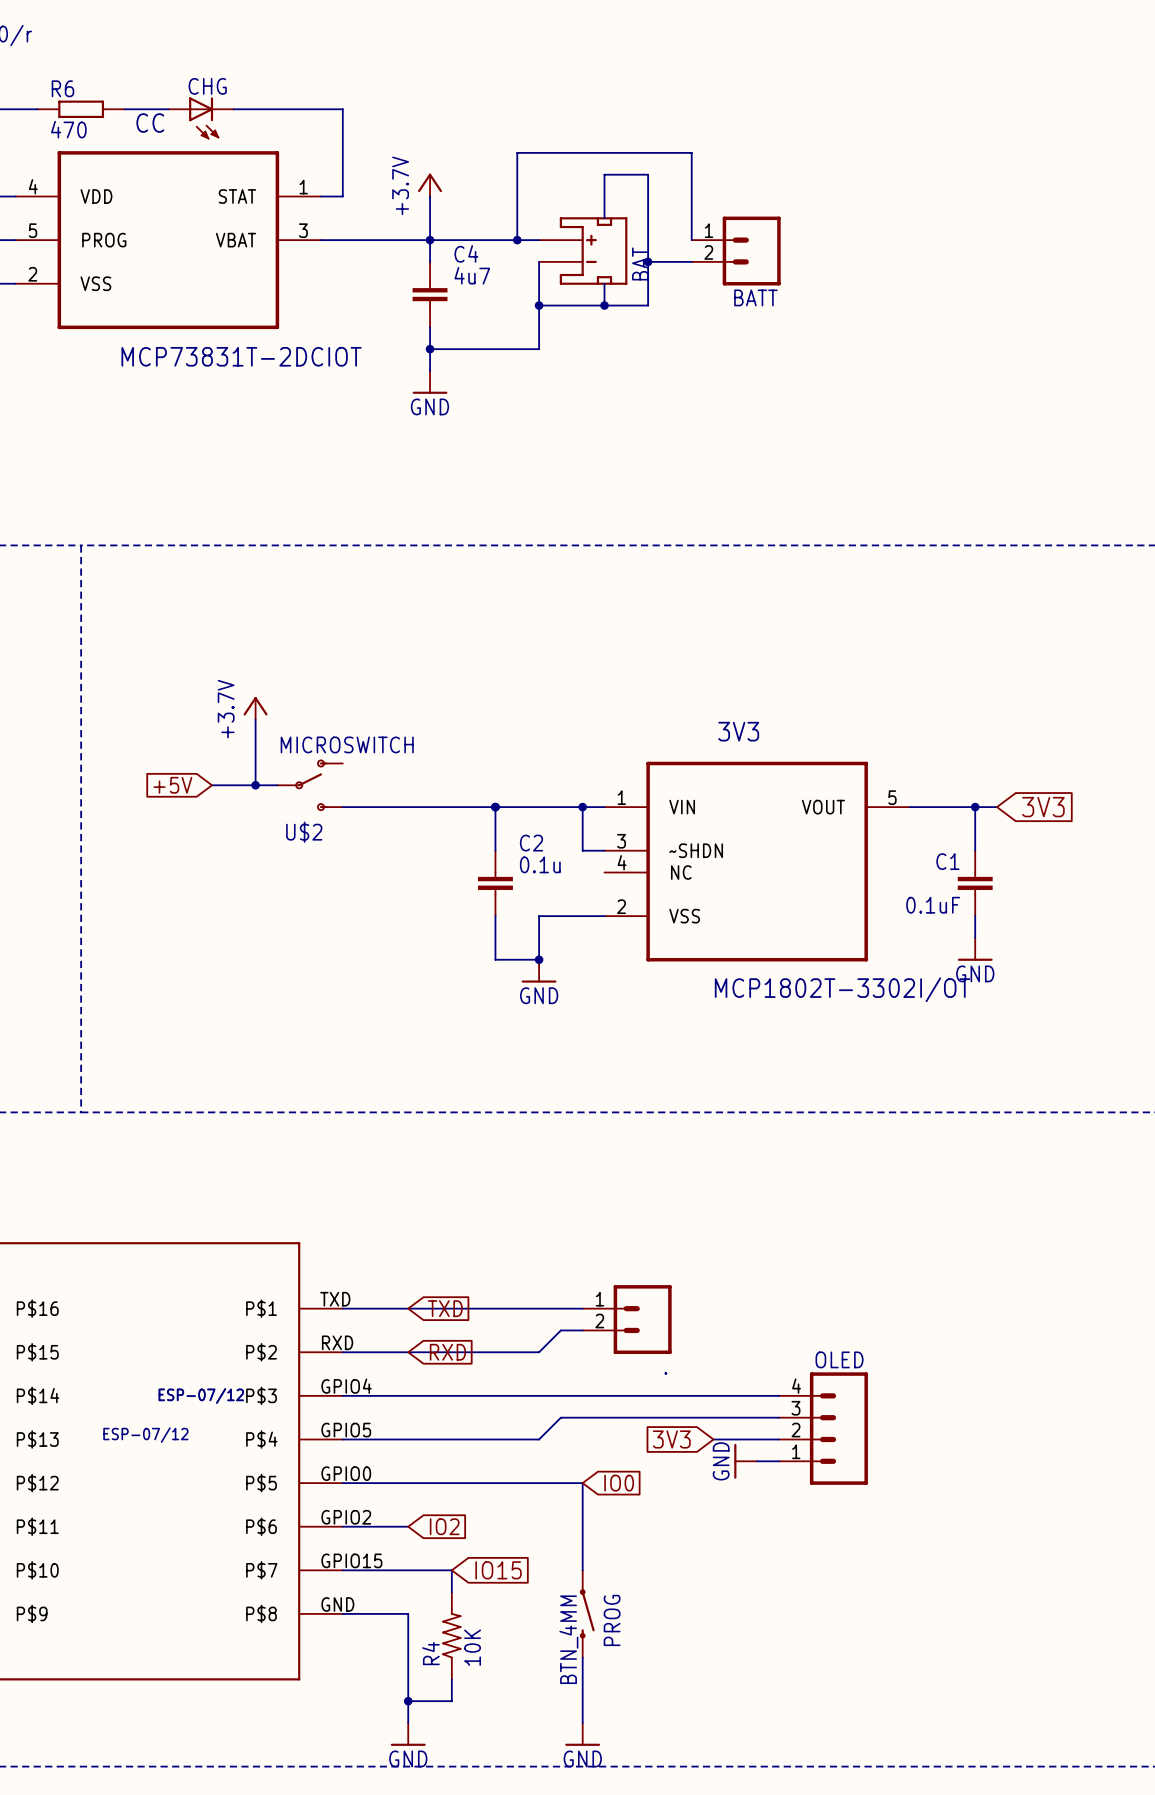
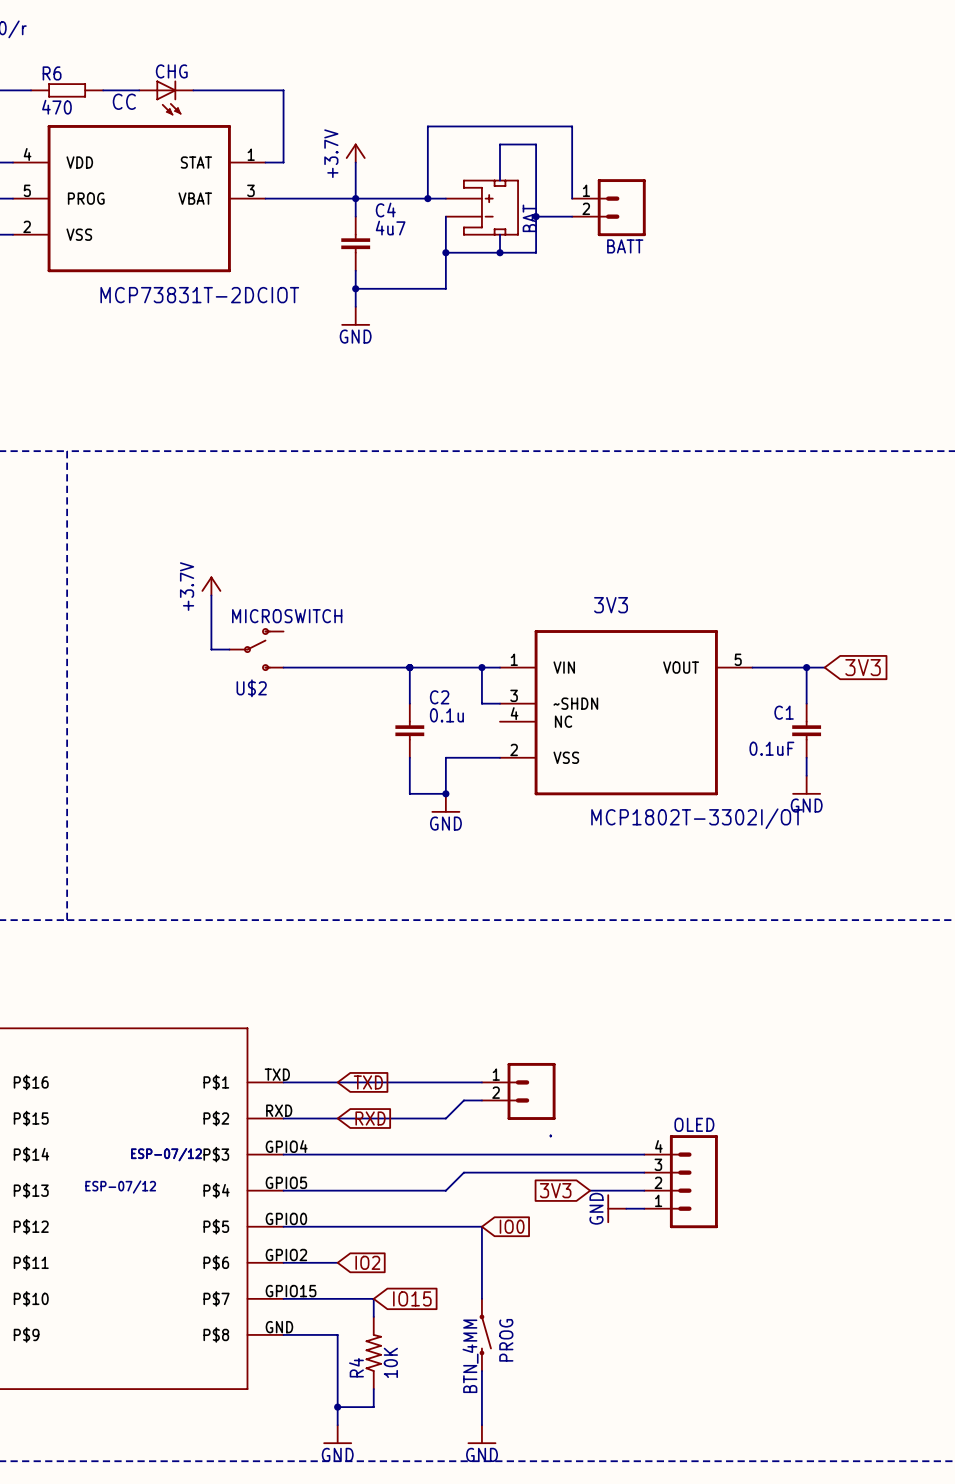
global label: +5V (172, 785) -> none
wire: (211, 785) (255, 785) -> none
junction: (255, 785) -> none

